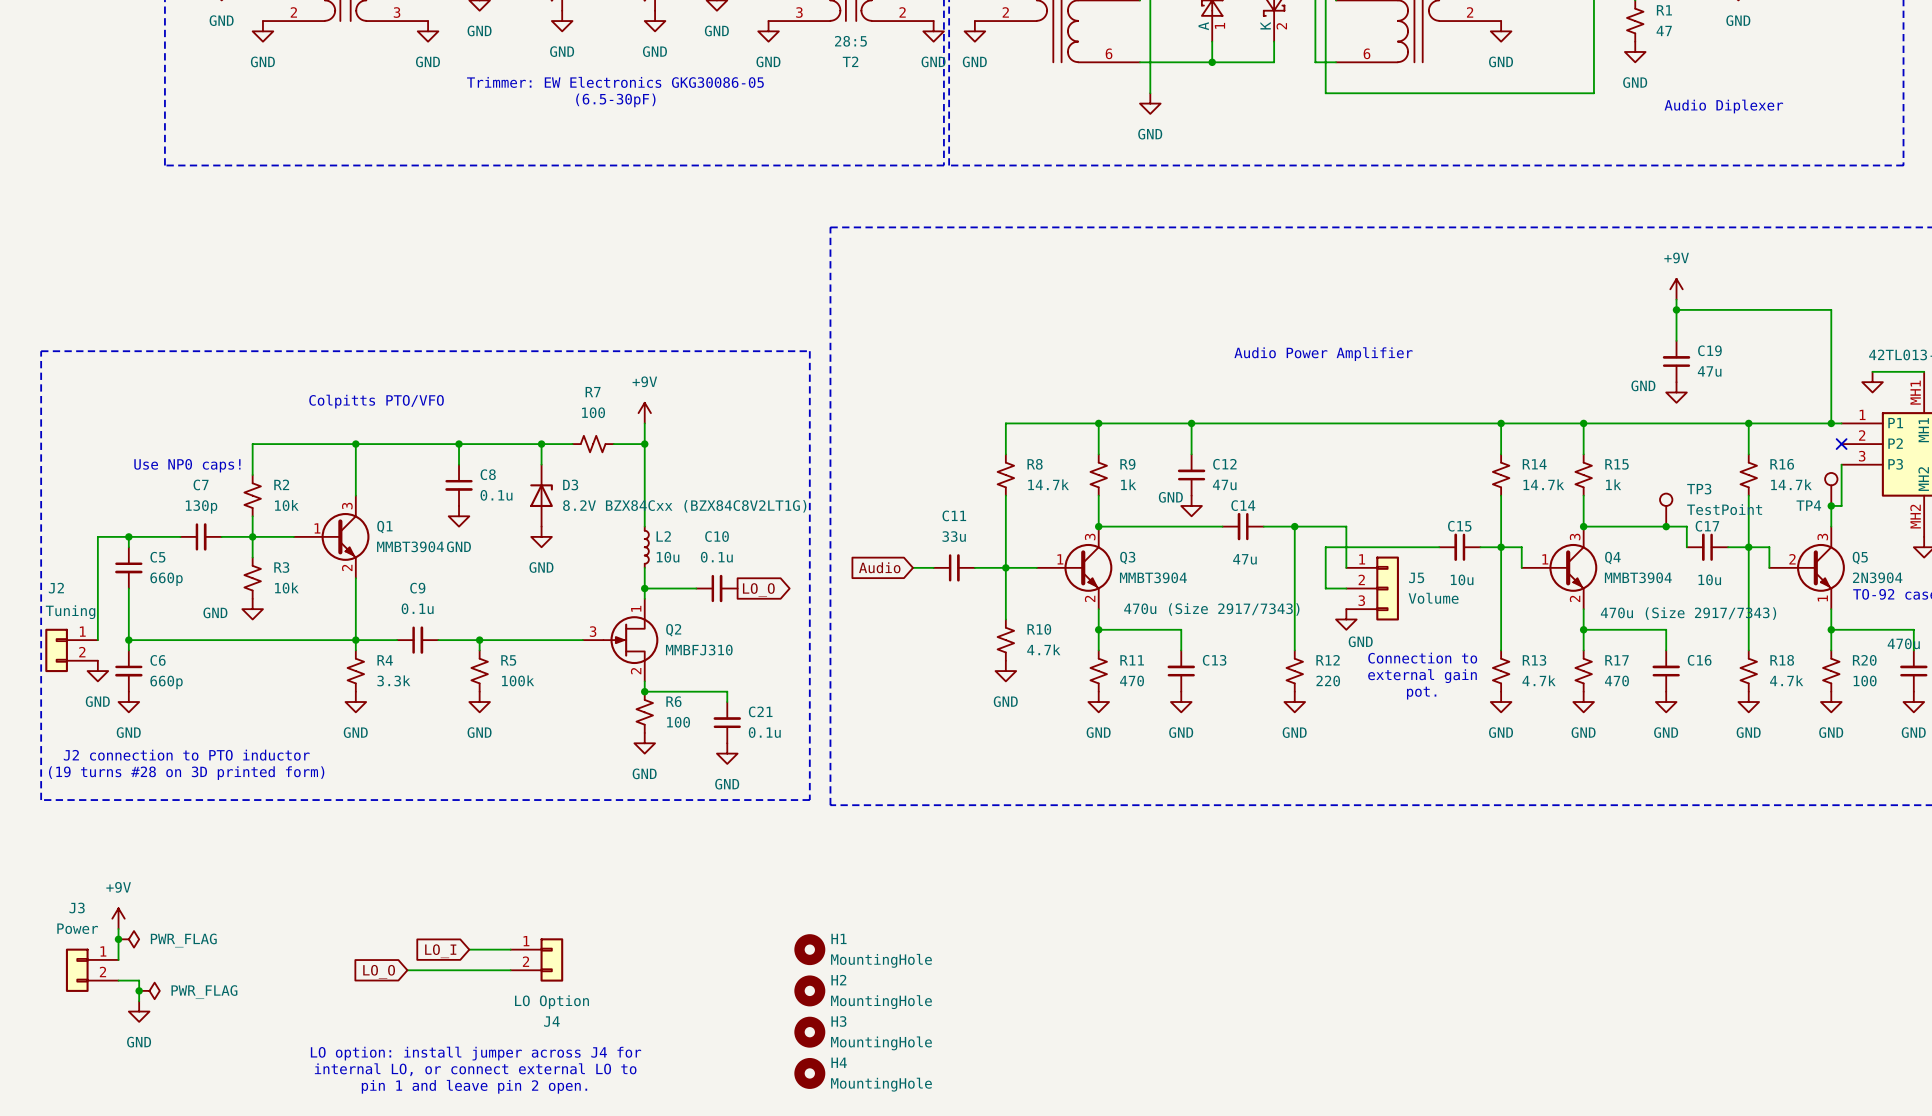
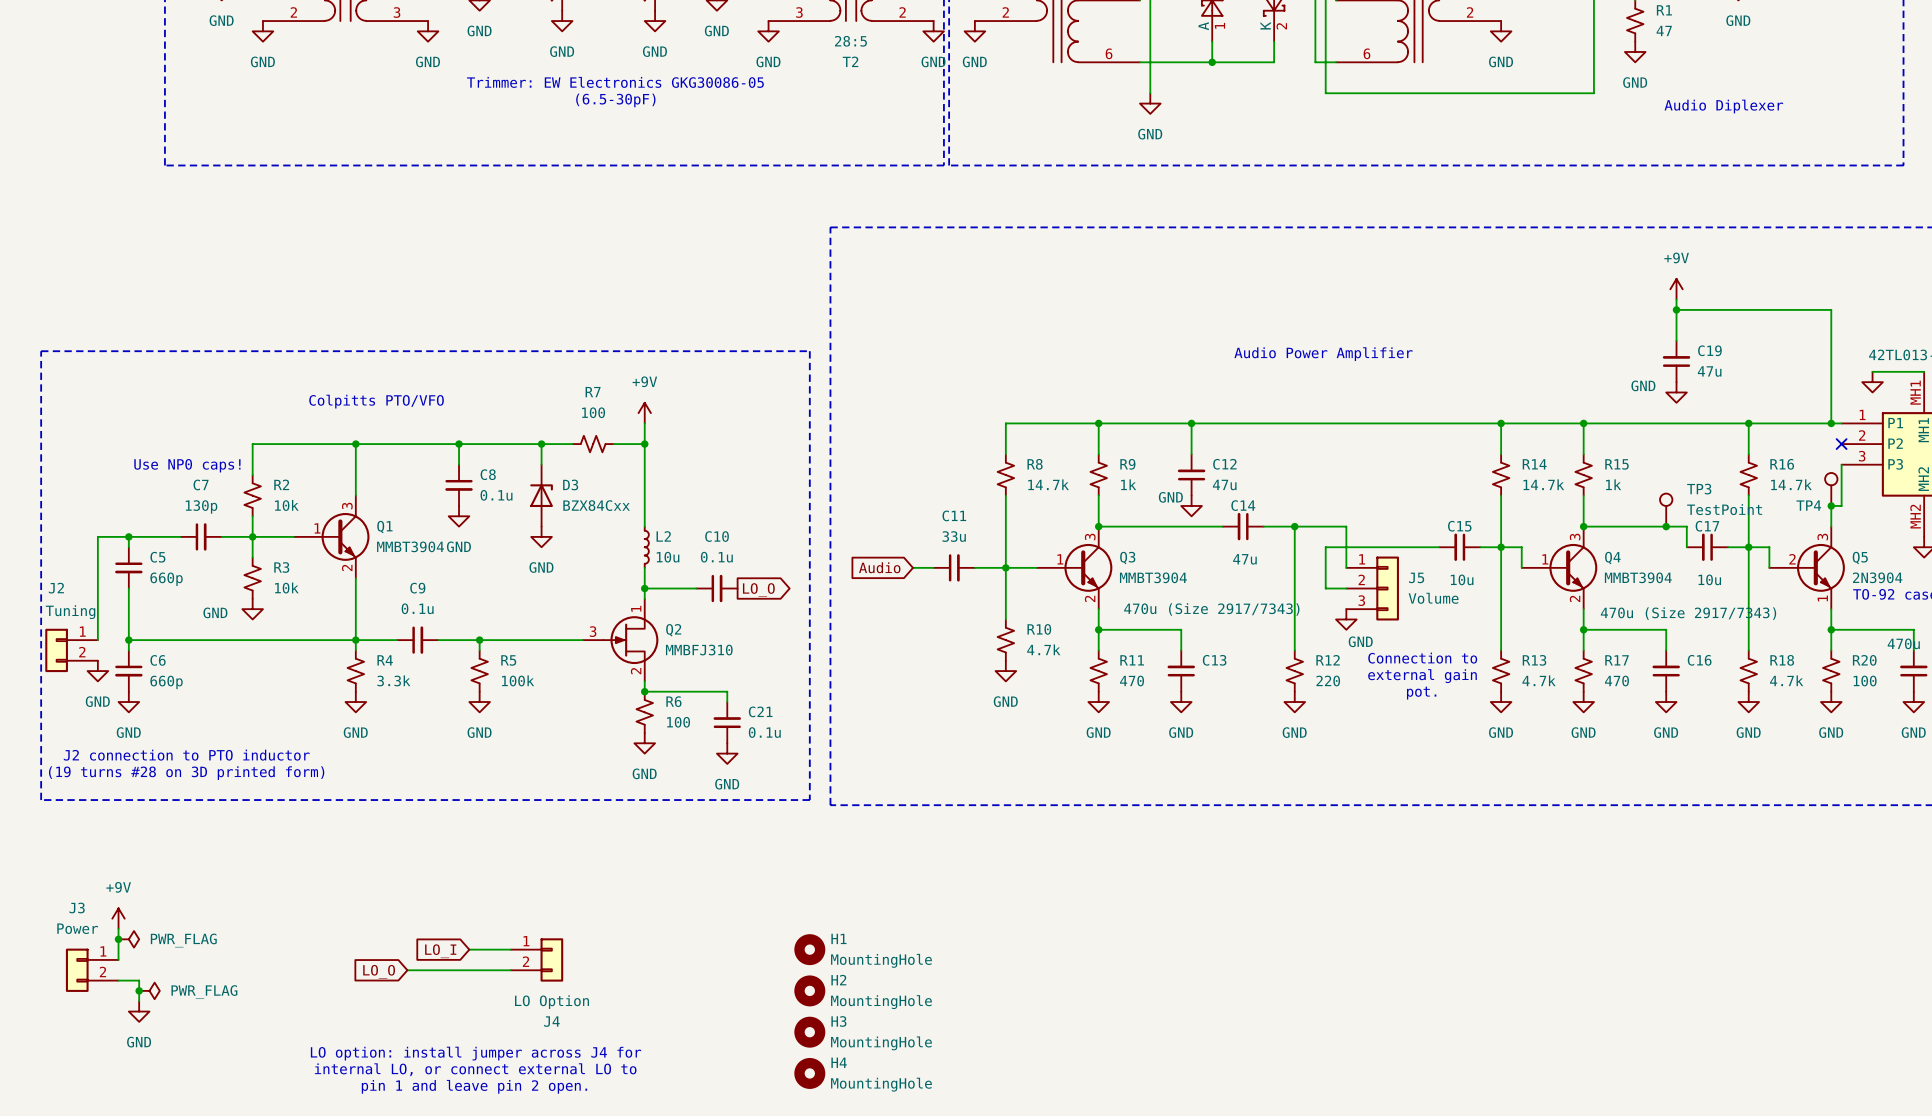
D3 value: 8.2V BZX84Cxx (BZX84C8V2LT1G) (684, 506) -> BZX84Cxx (596, 505)

